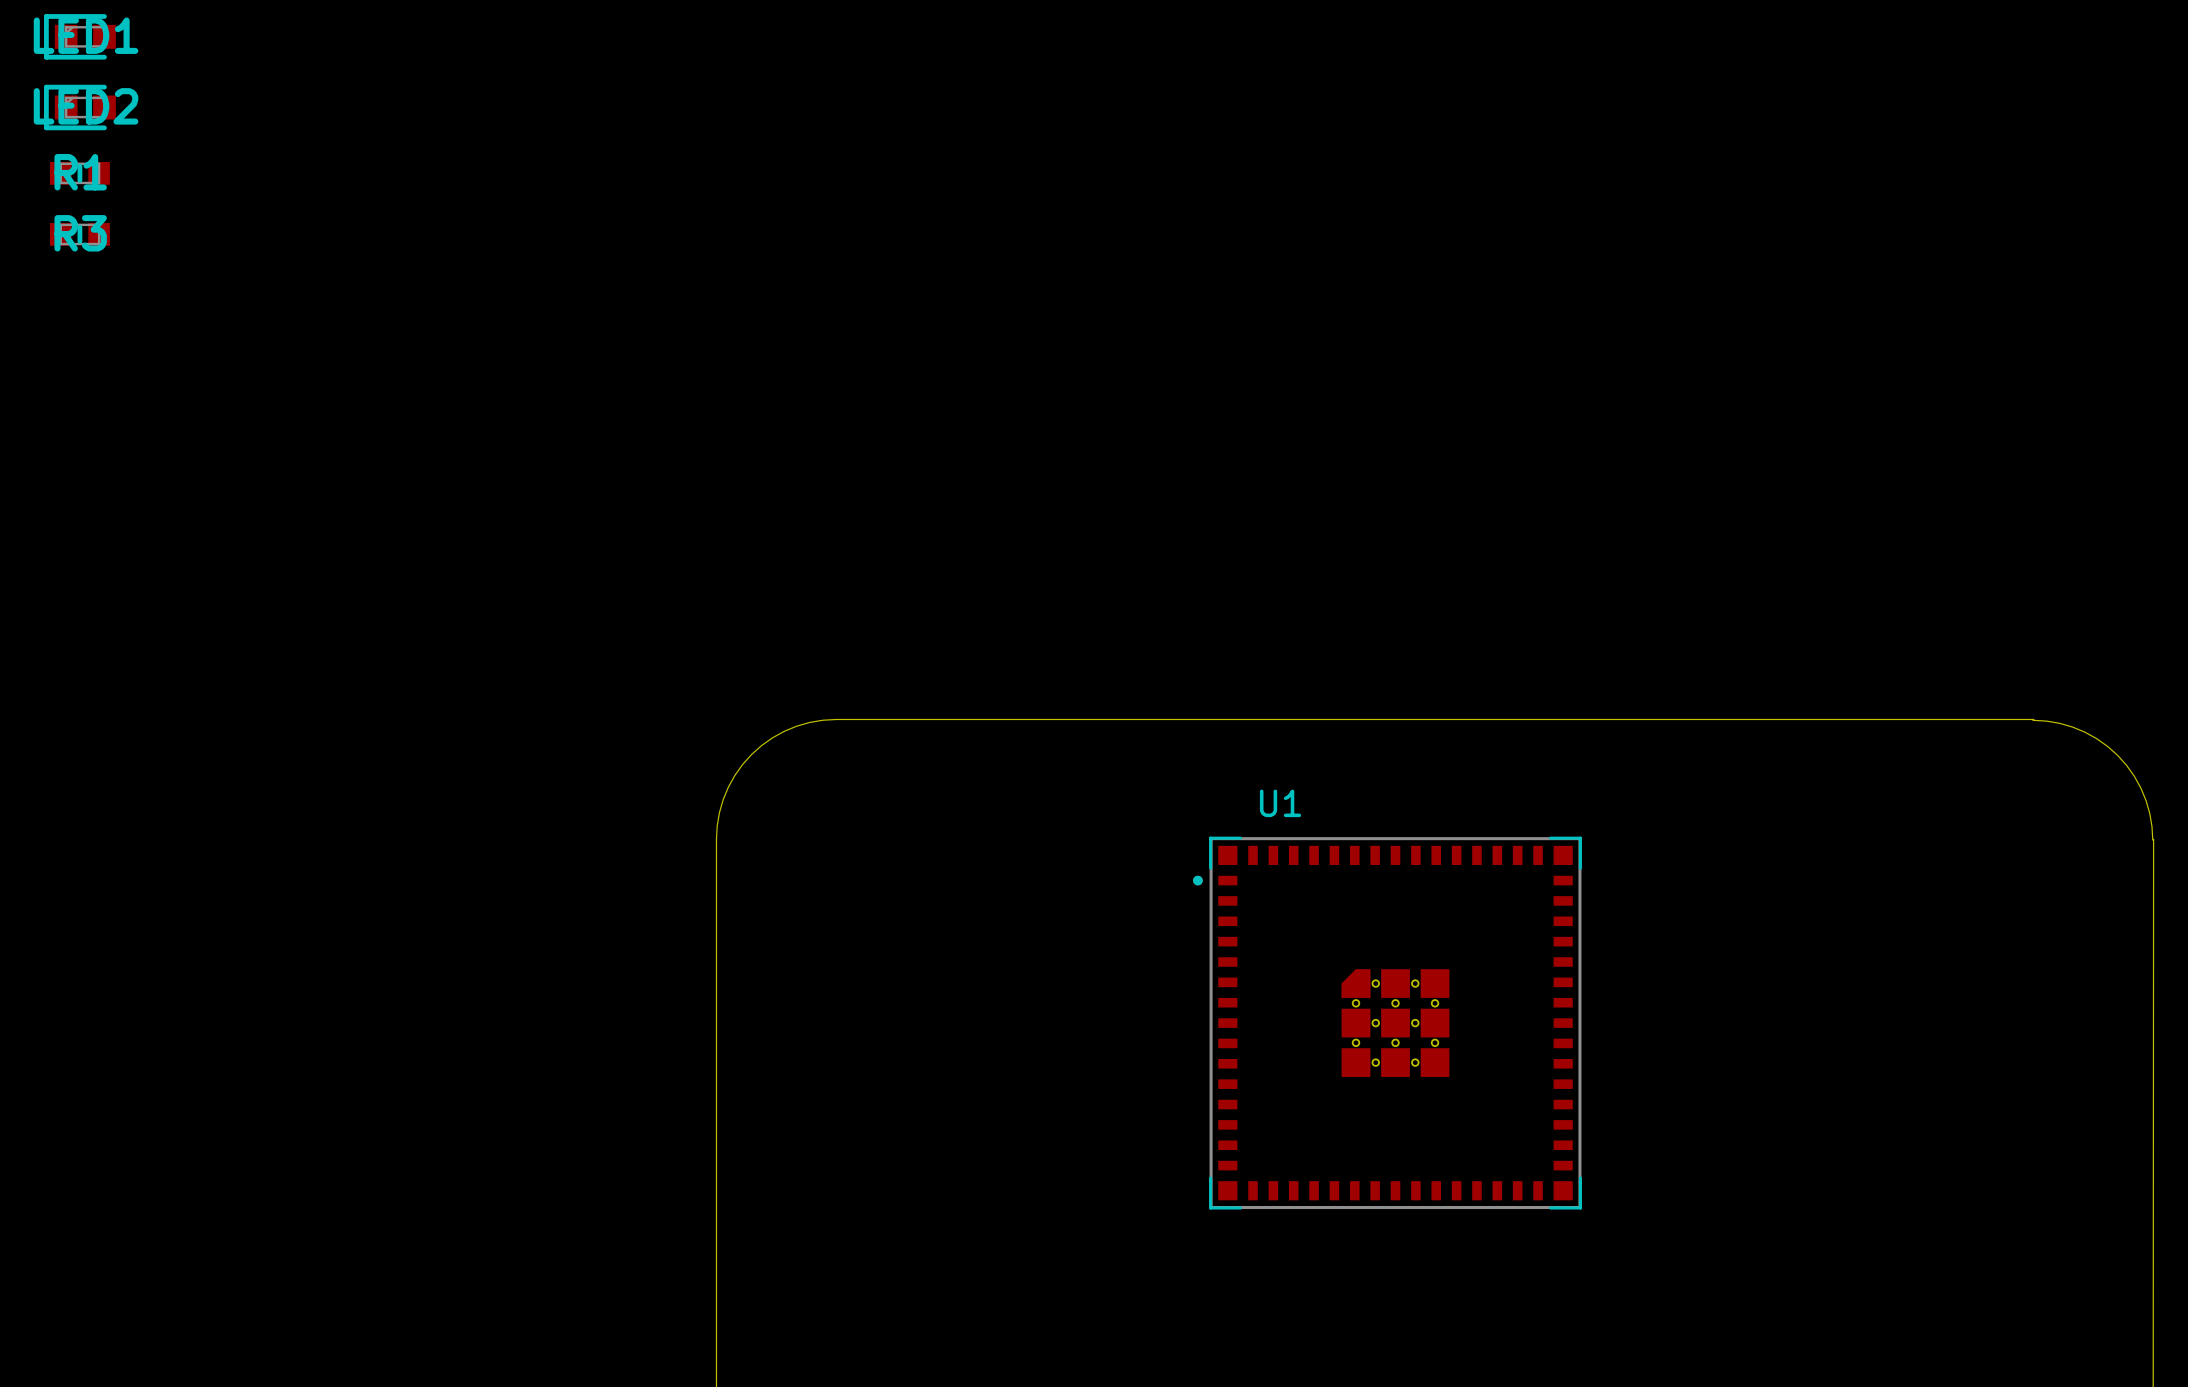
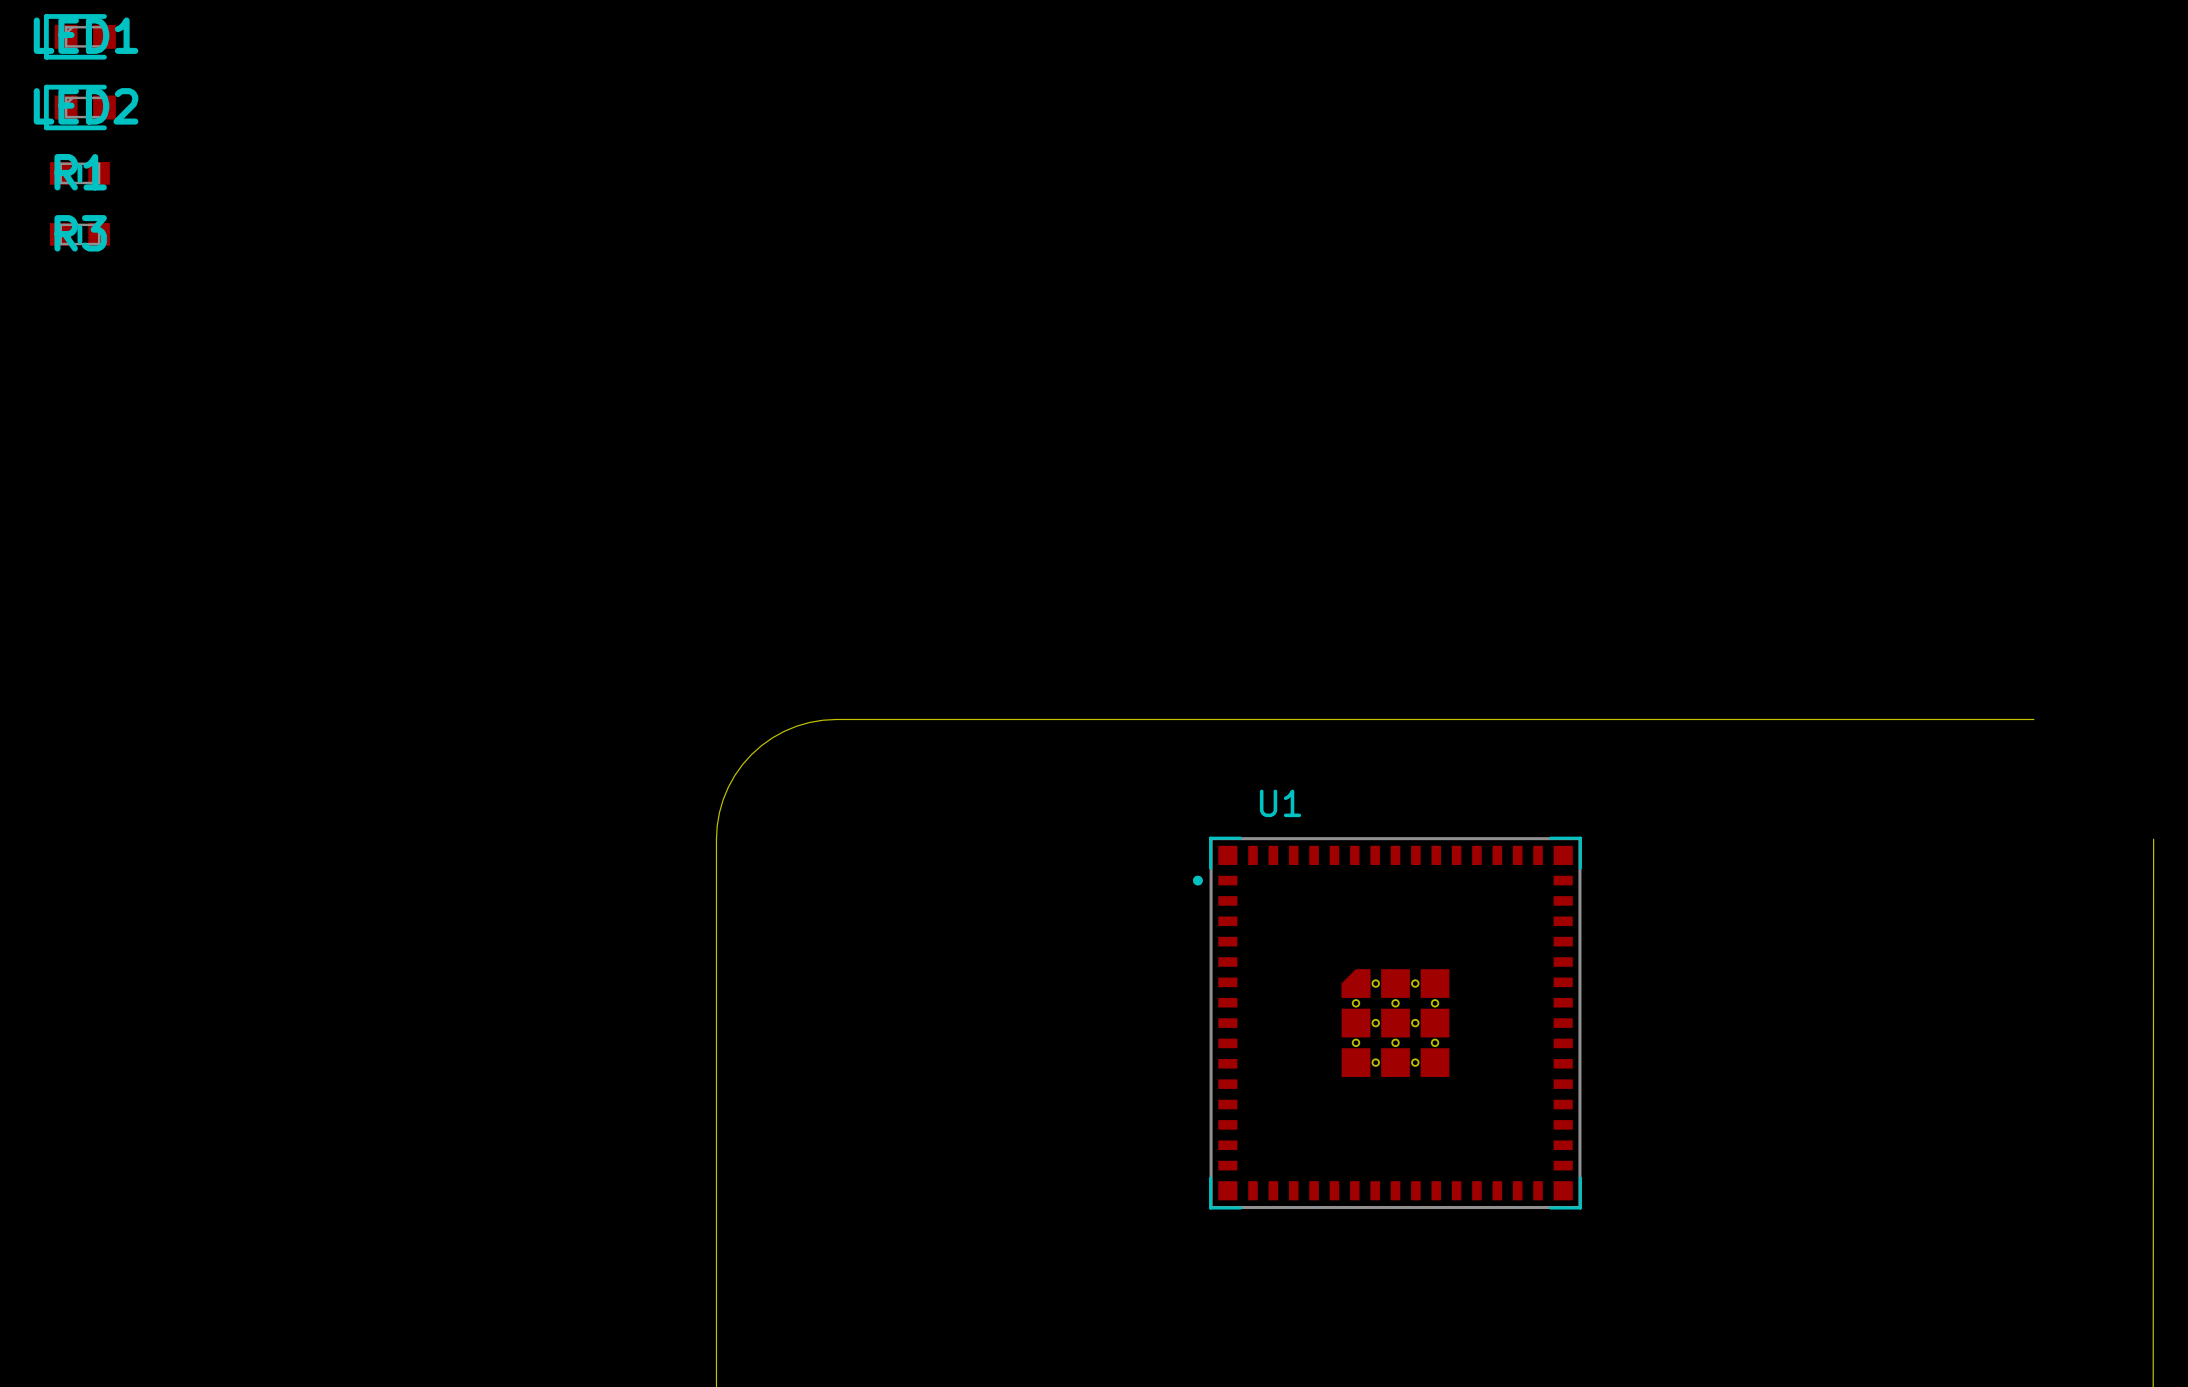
board edge: (2033, 720) (2059, 723) (2084, 732) (2107, 746) (2117, 755) (2134, 776) (2140, 788) (2149, 813) (2152, 840) -> none

